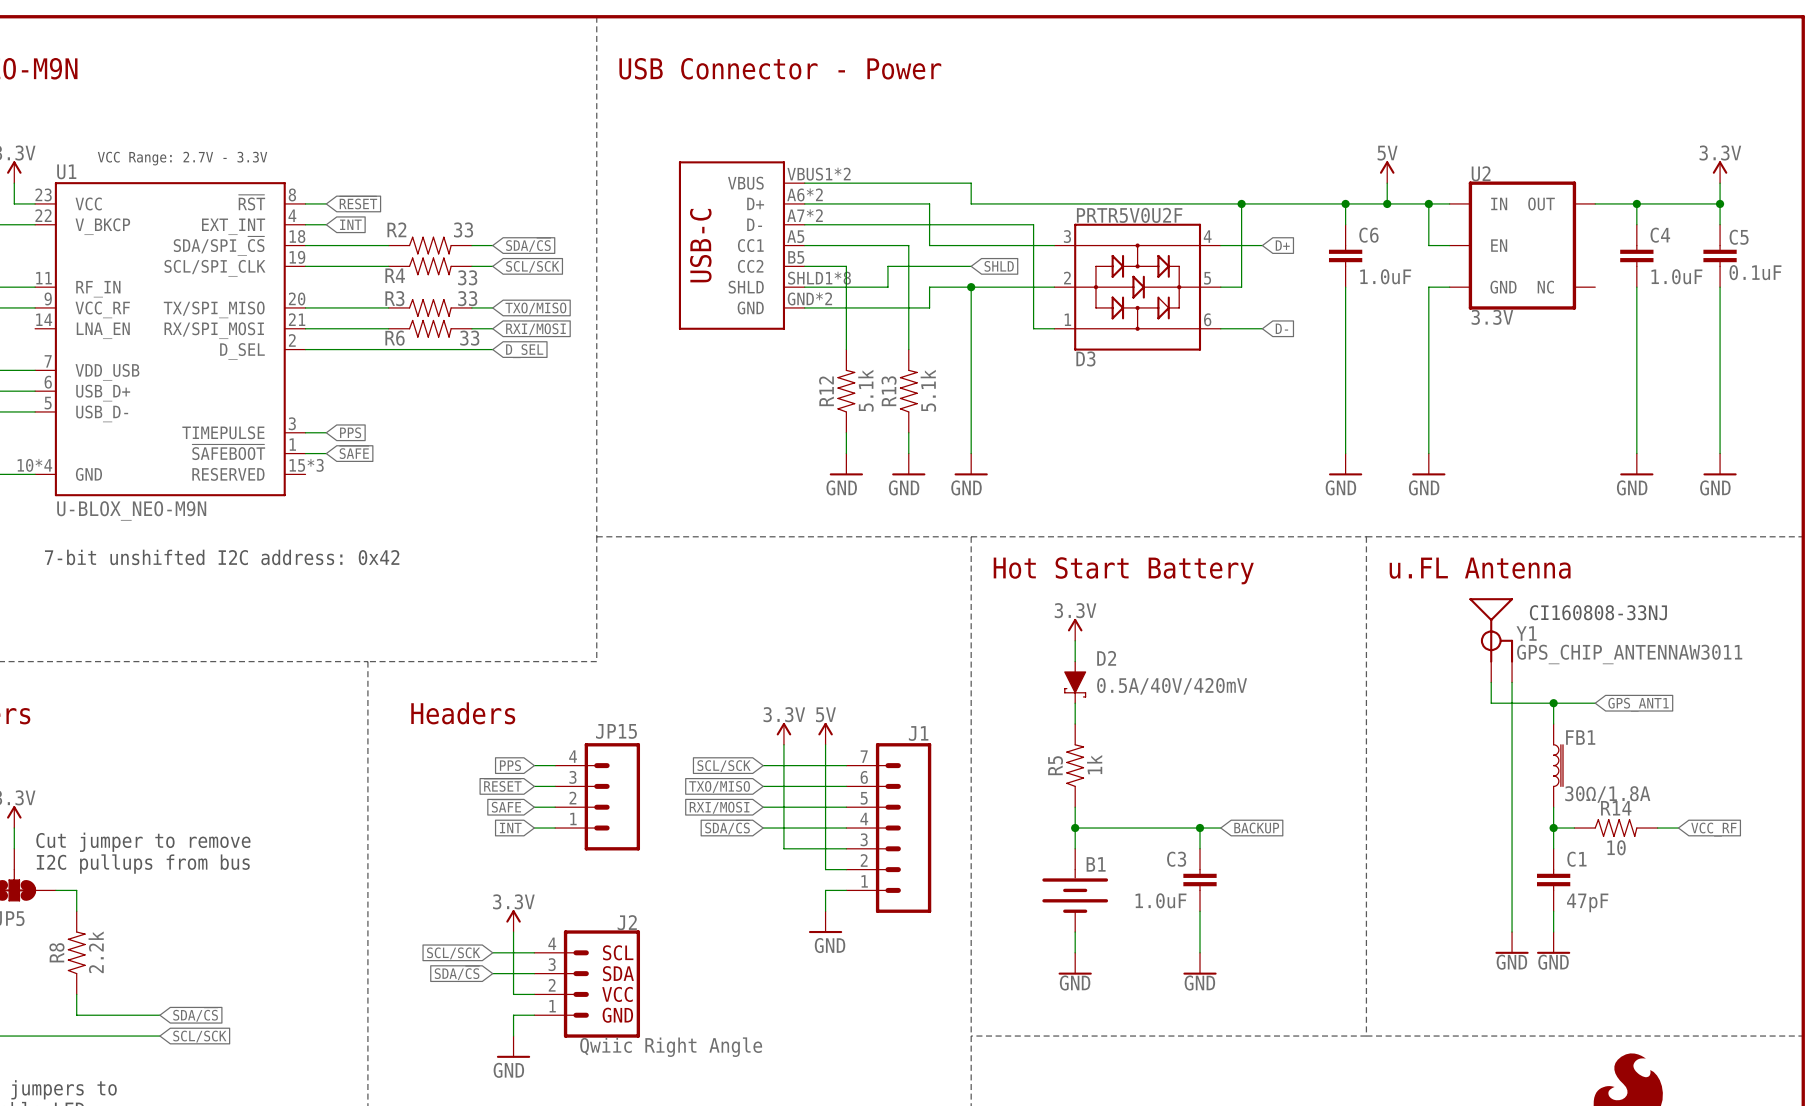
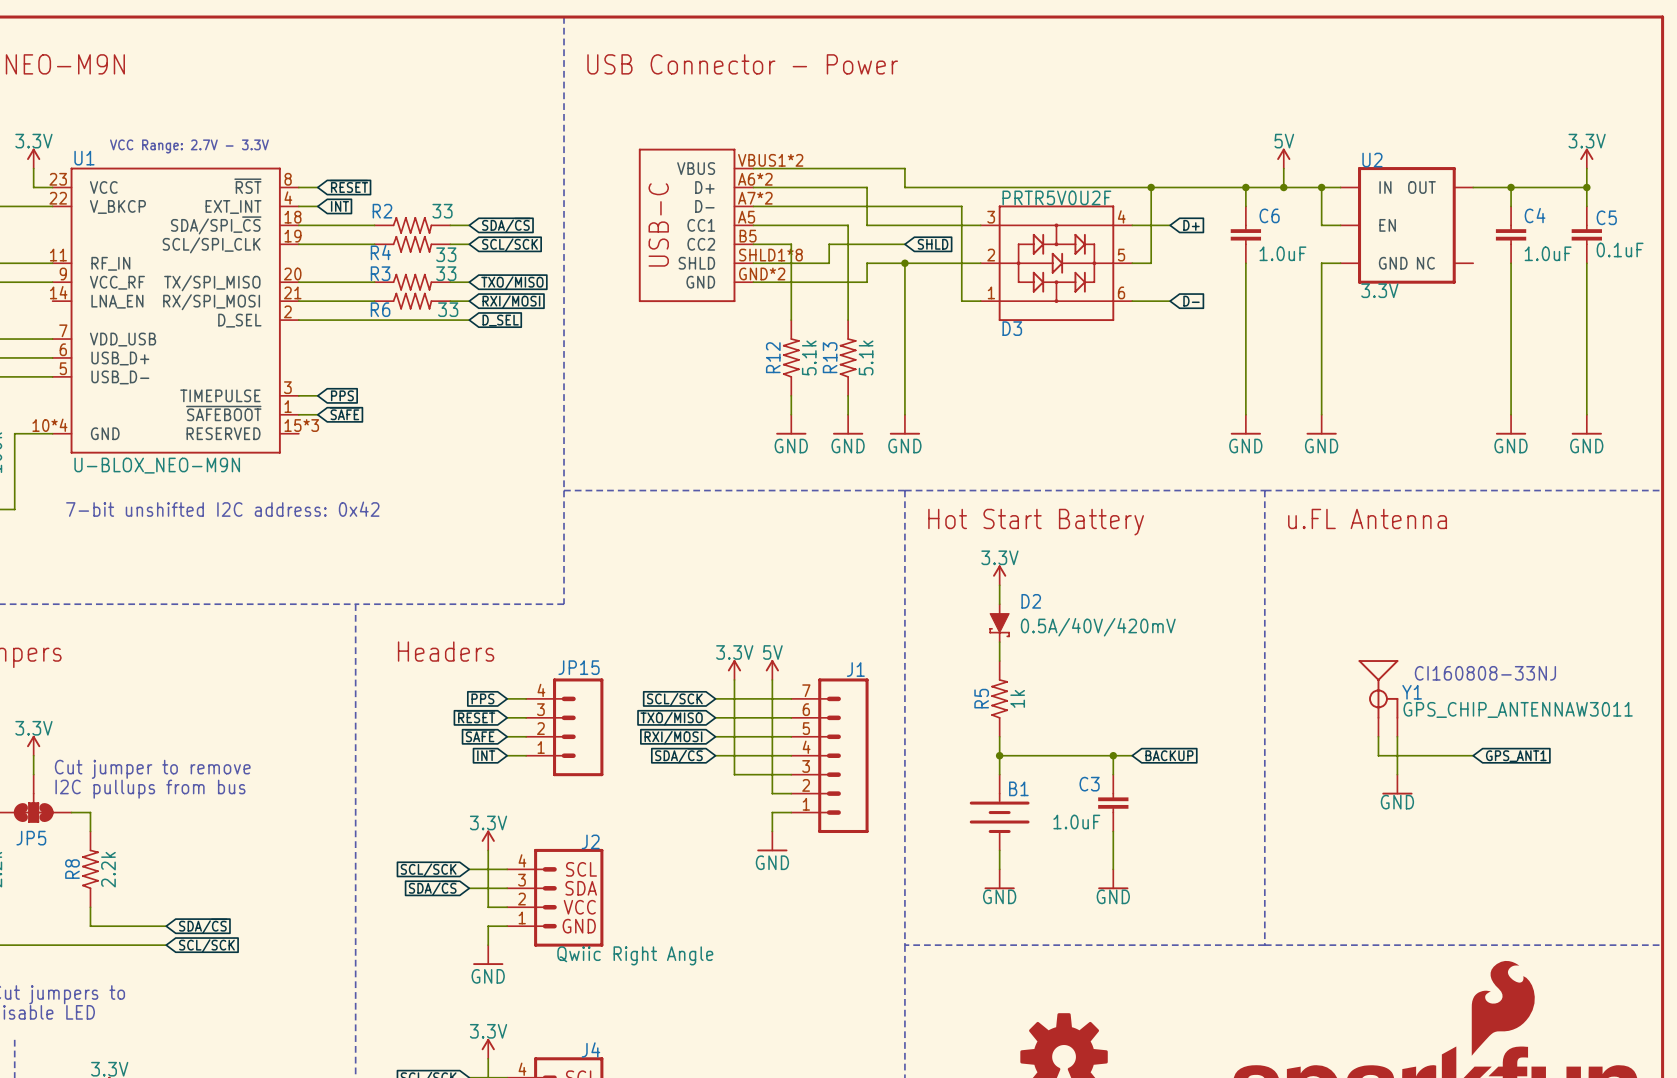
text position: CI160808-33NJ (1598, 612) -> CI160808-33NJ (1485, 673)
Y1 position: (1491, 640) -> (1378, 698)
wire: (1491, 682) (1491, 703) (1595, 703) -> none
wire: (1512, 682) (1512, 807) -> none
wire: (1553, 703) (1553, 724) -> none
junction: (1553, 703) -> none
global label position: GPS_ANT1 (1638, 704) -> GPS_ANT1 (1516, 756)
FB1: 30Ω/1.8A (1558, 765) -> none
wire: none -> (1378, 736) (1378, 755) (1435, 755)
wire: (1553, 807) (1553, 848) -> none
junction: (1553, 828) -> none
R14: 10 (1616, 828) -> none
global label: VCC_RF (1713, 829) -> none
wire: (1512, 848) (1512, 932) -> none
power symbol: none -> GND (1397, 784)
C1: 47pF (1553, 880) -> none
wire: (1553, 911) (1553, 932) -> none
power symbol: GND (1512, 942) -> none
power symbol: GND (1553, 942) -> none

